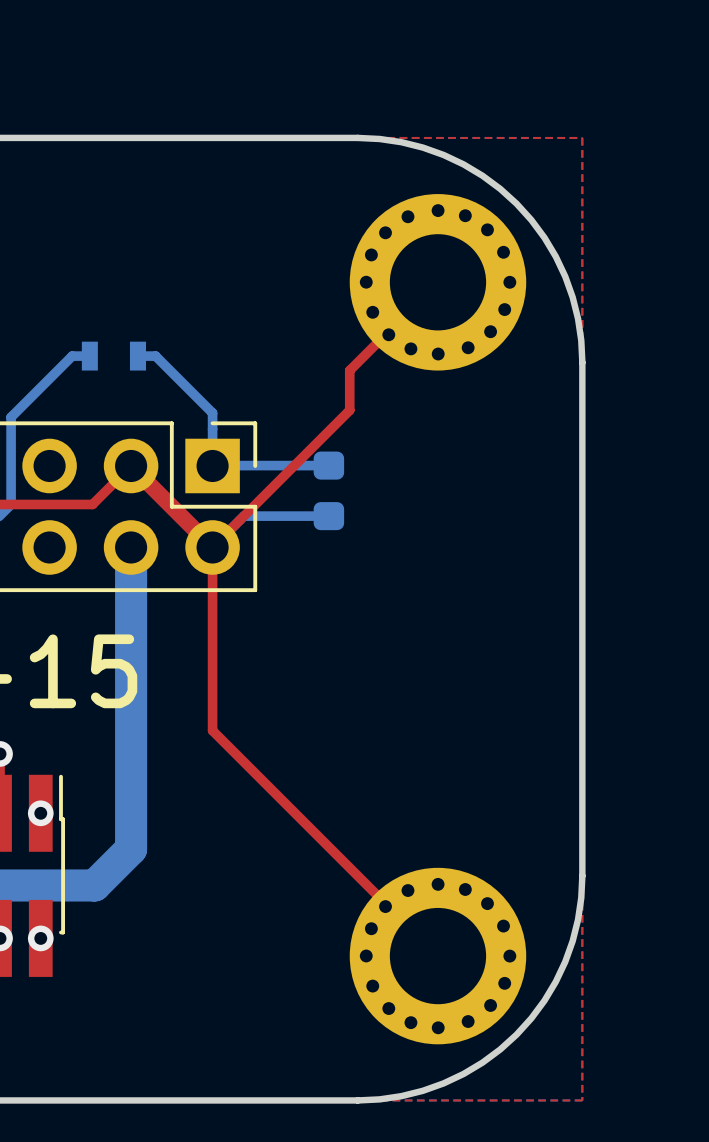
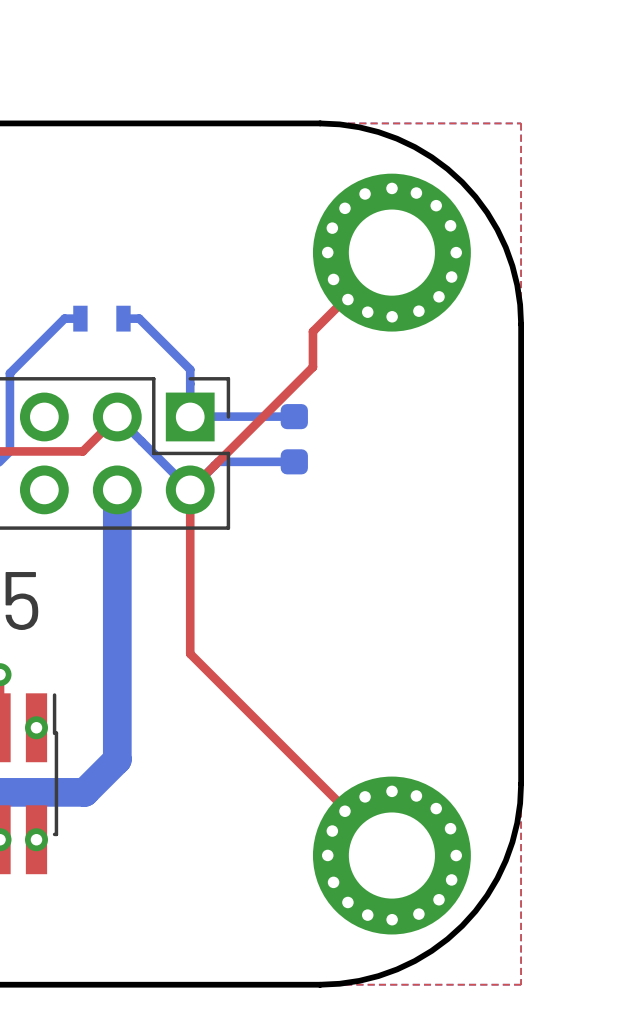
top track: (131, 465) (212, 547) -> none
bottom track: none -> (117, 416) (190, 489)

